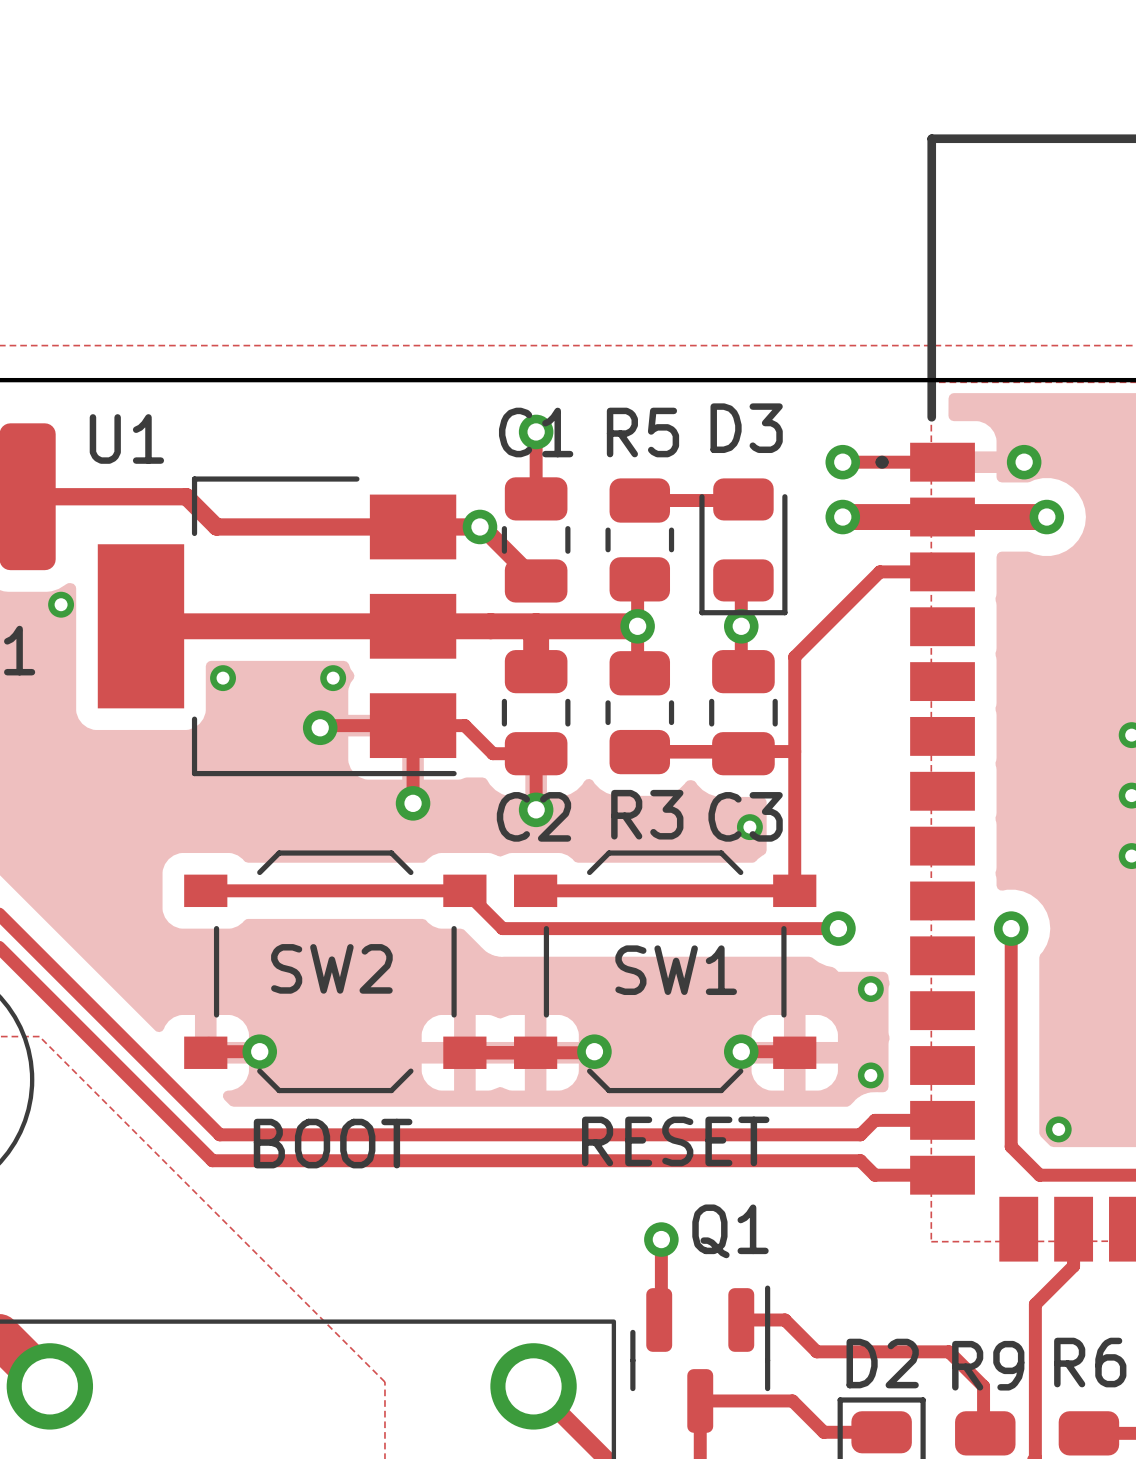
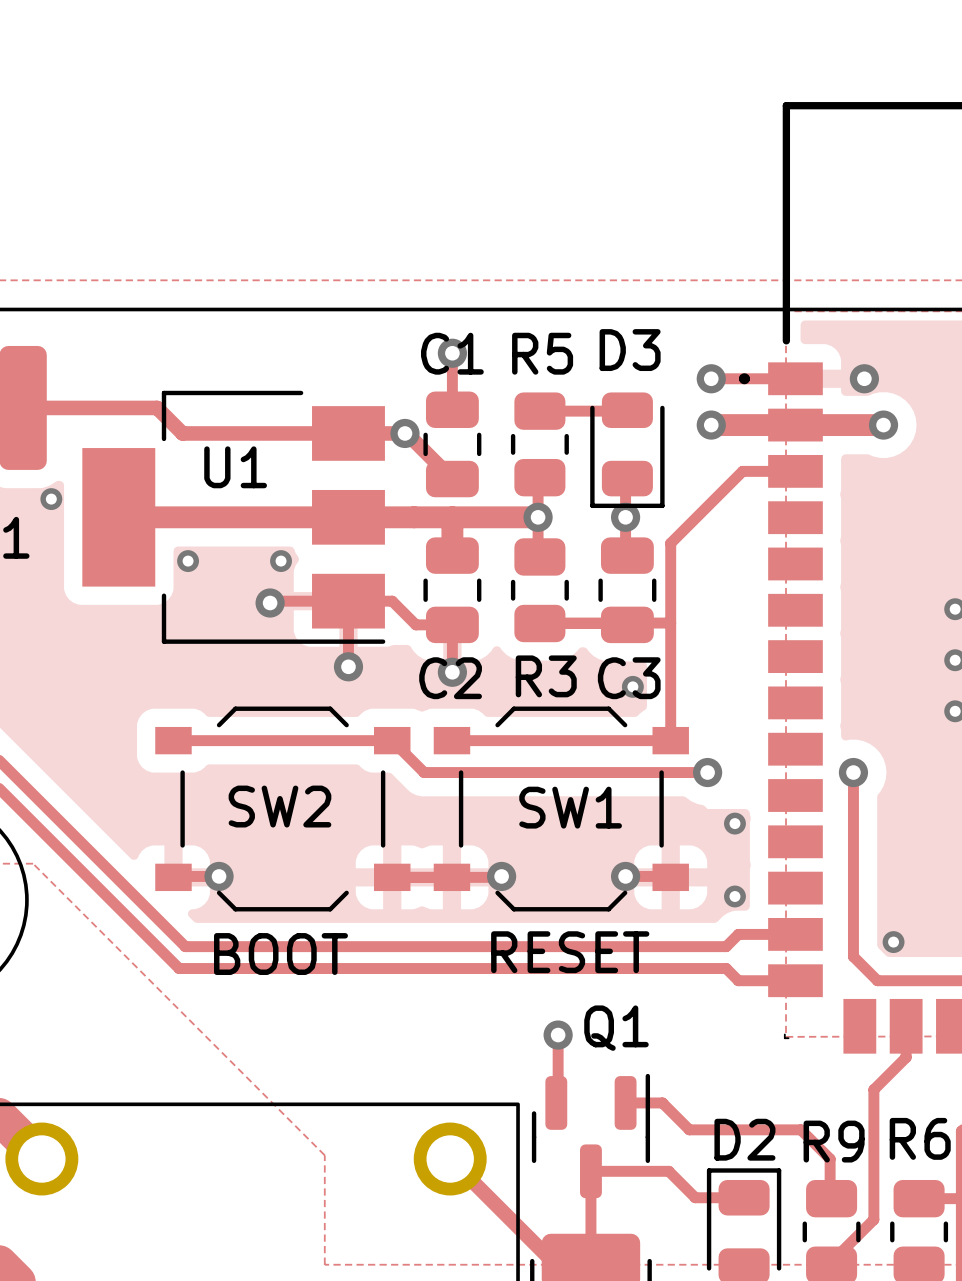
U1 name position: U1 (126, 438) -> U1 (235, 467)
line: none -> (784, 1034) (784, 1038) (788, 1038)

